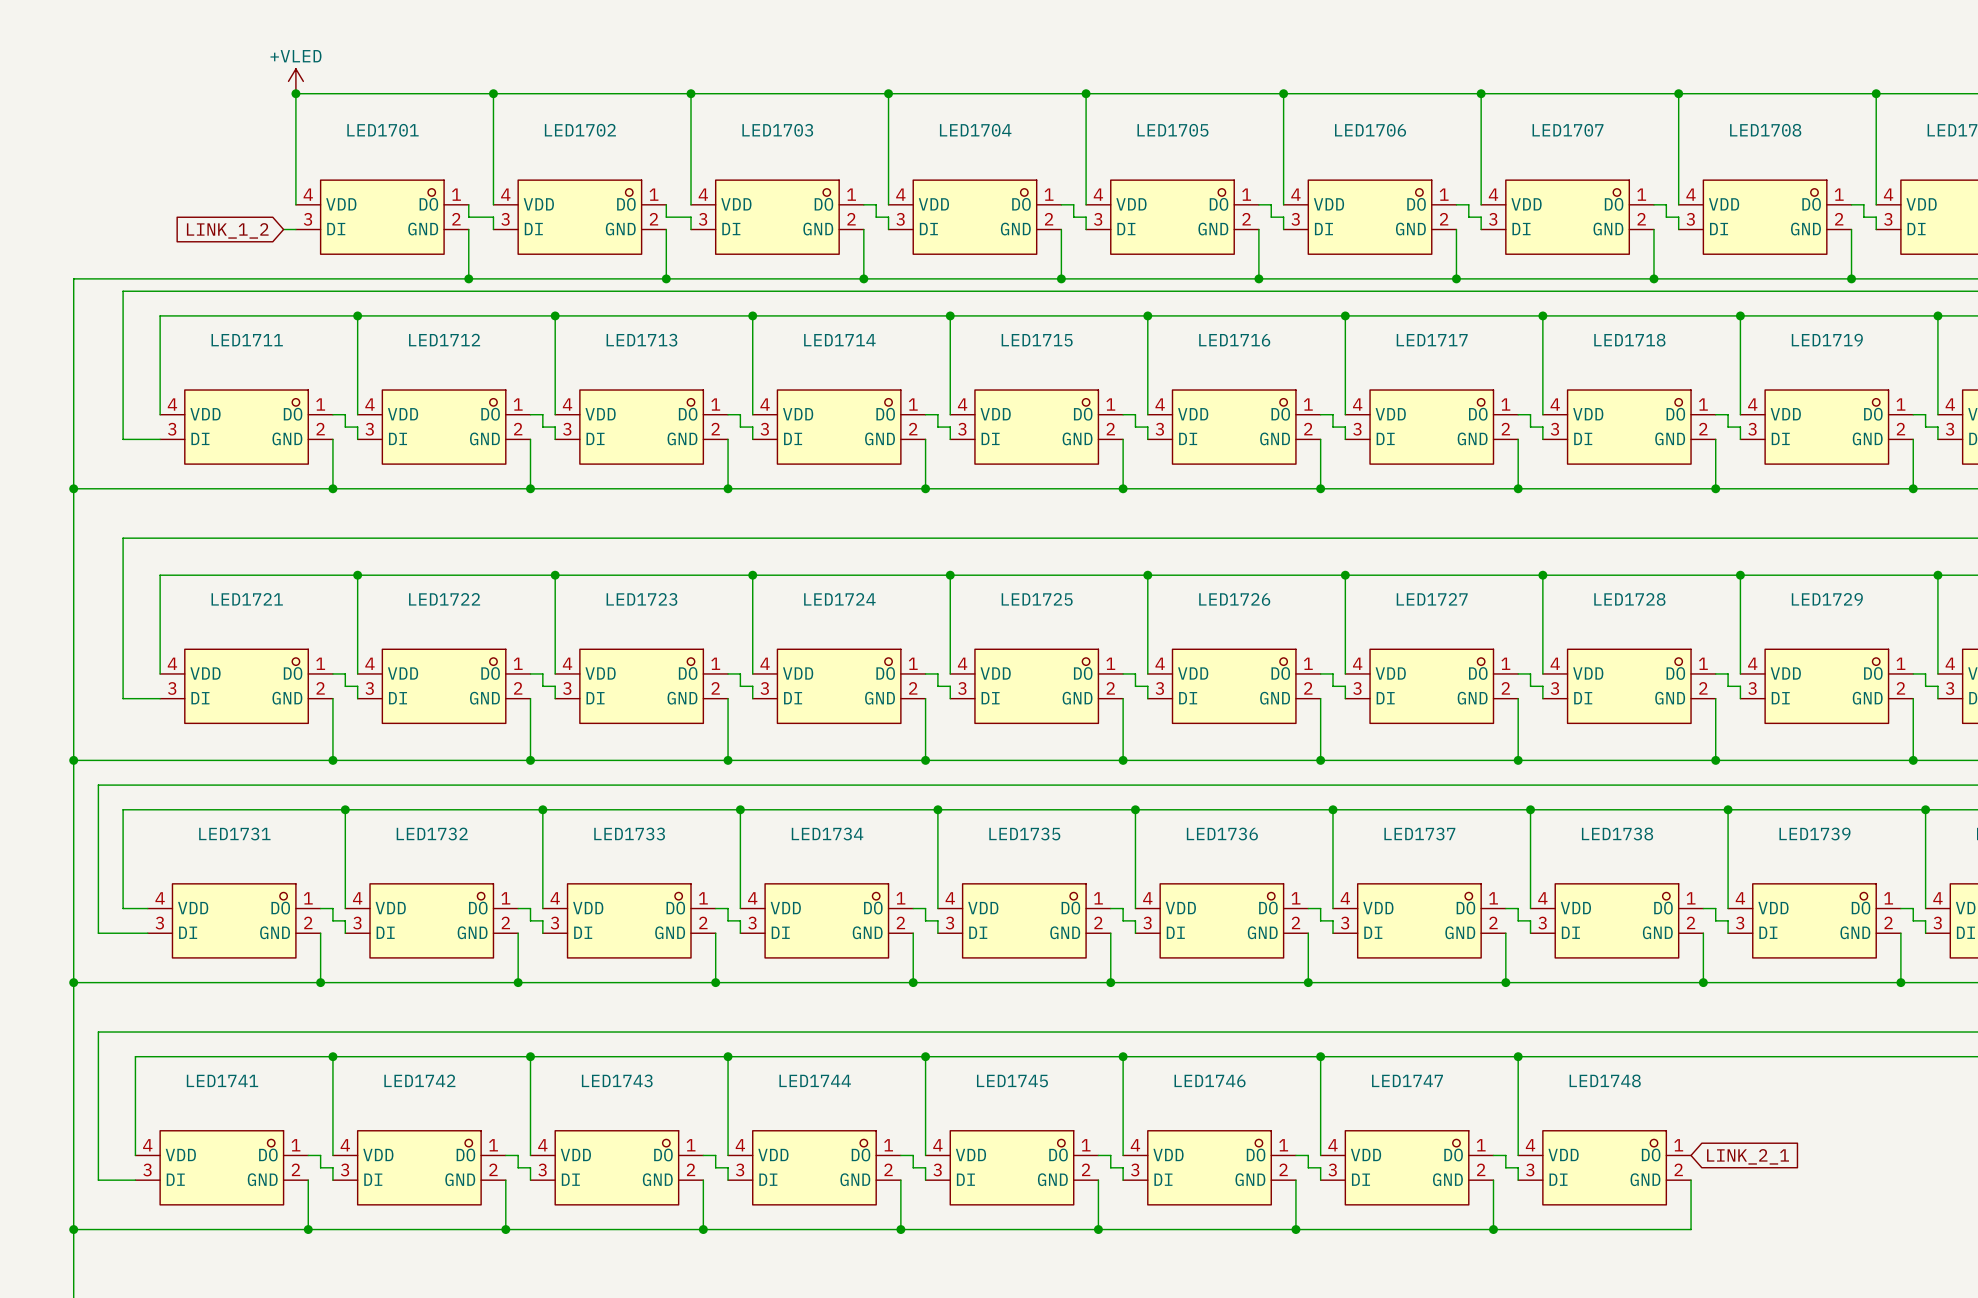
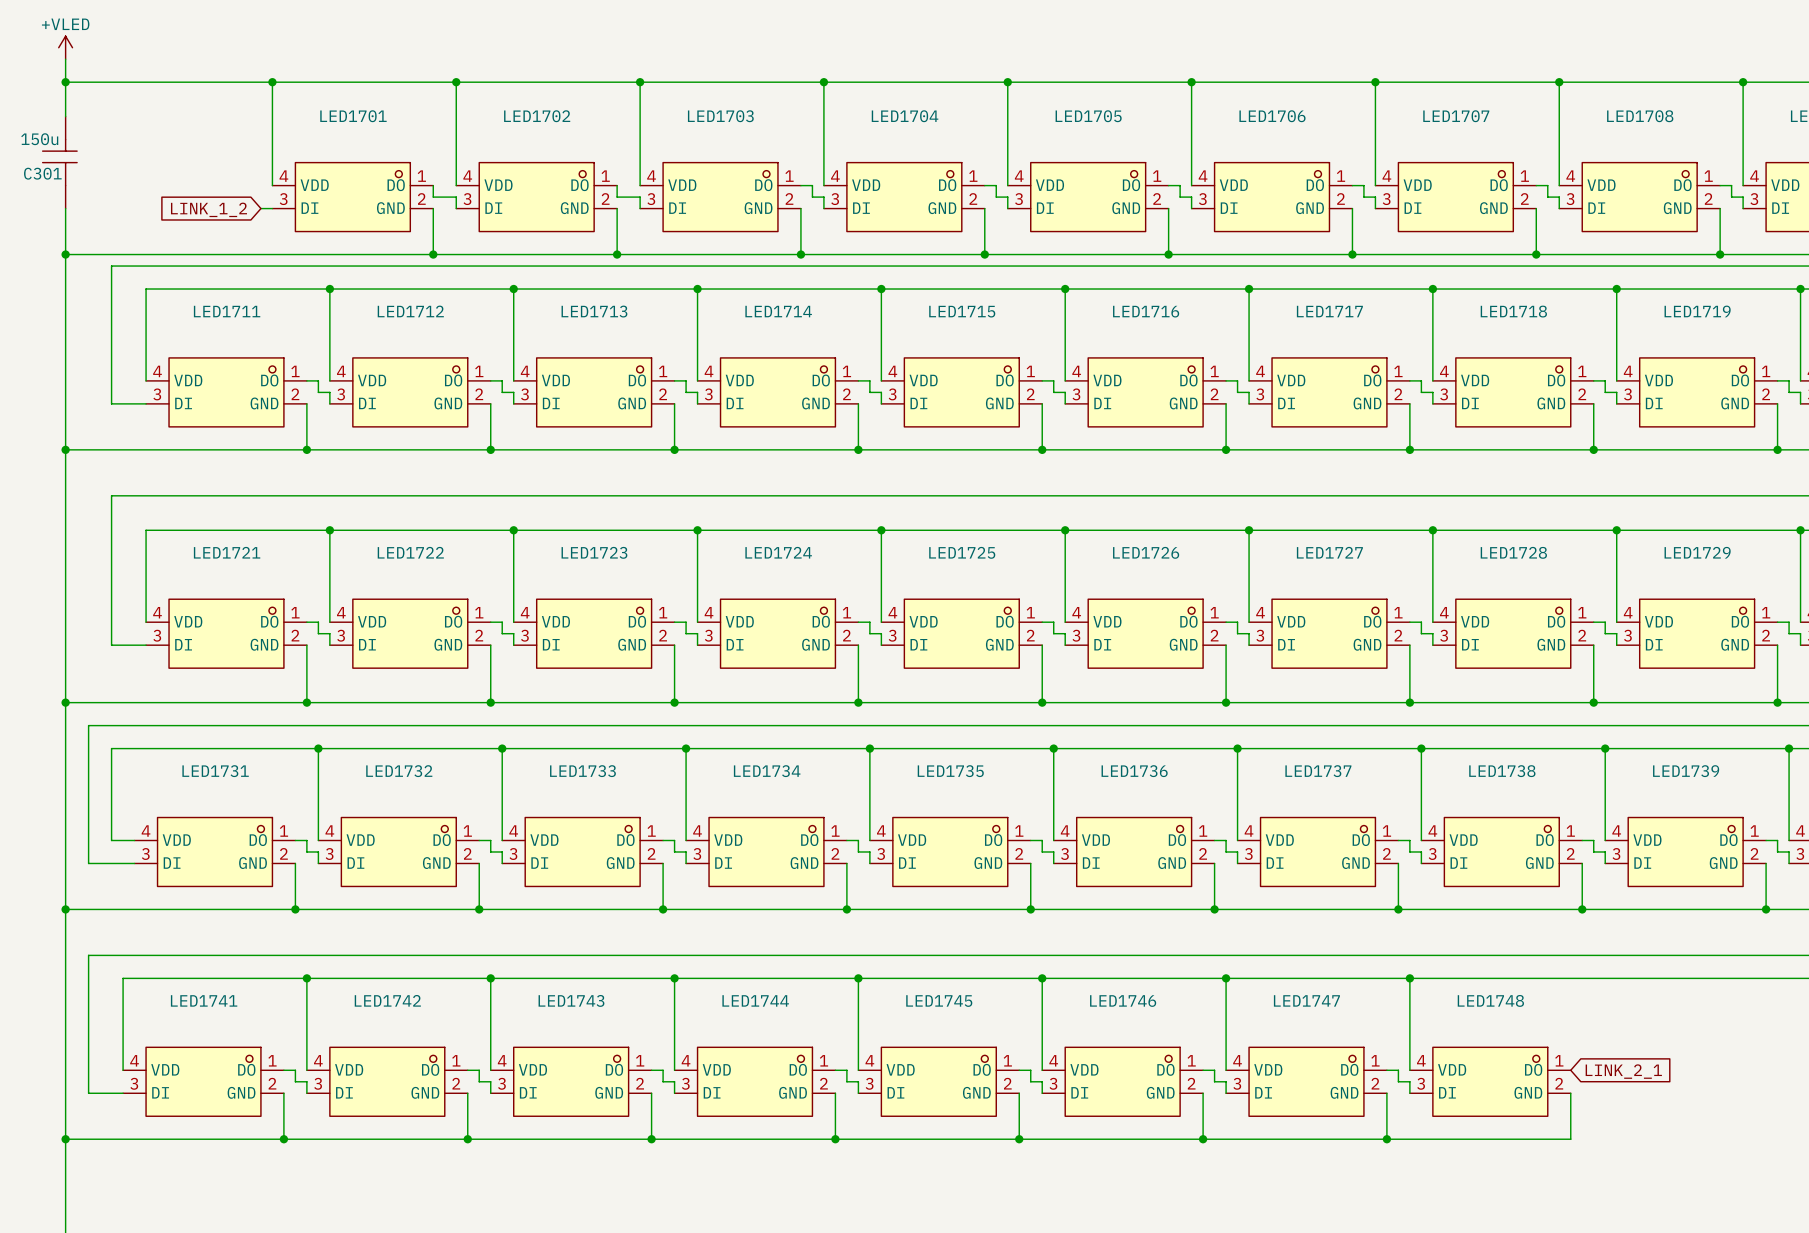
wire: none -> (65, 59) (65, 116)
power symbol position: +VLED (295, 81) -> +VLED (65, 47)
wire: none -> (65, 82) (272, 82)
junction: none -> (65, 82)
C301: none -> 150u (59, 162)
wire: none -> (65, 208) (65, 254)
junction: none -> (65, 254)

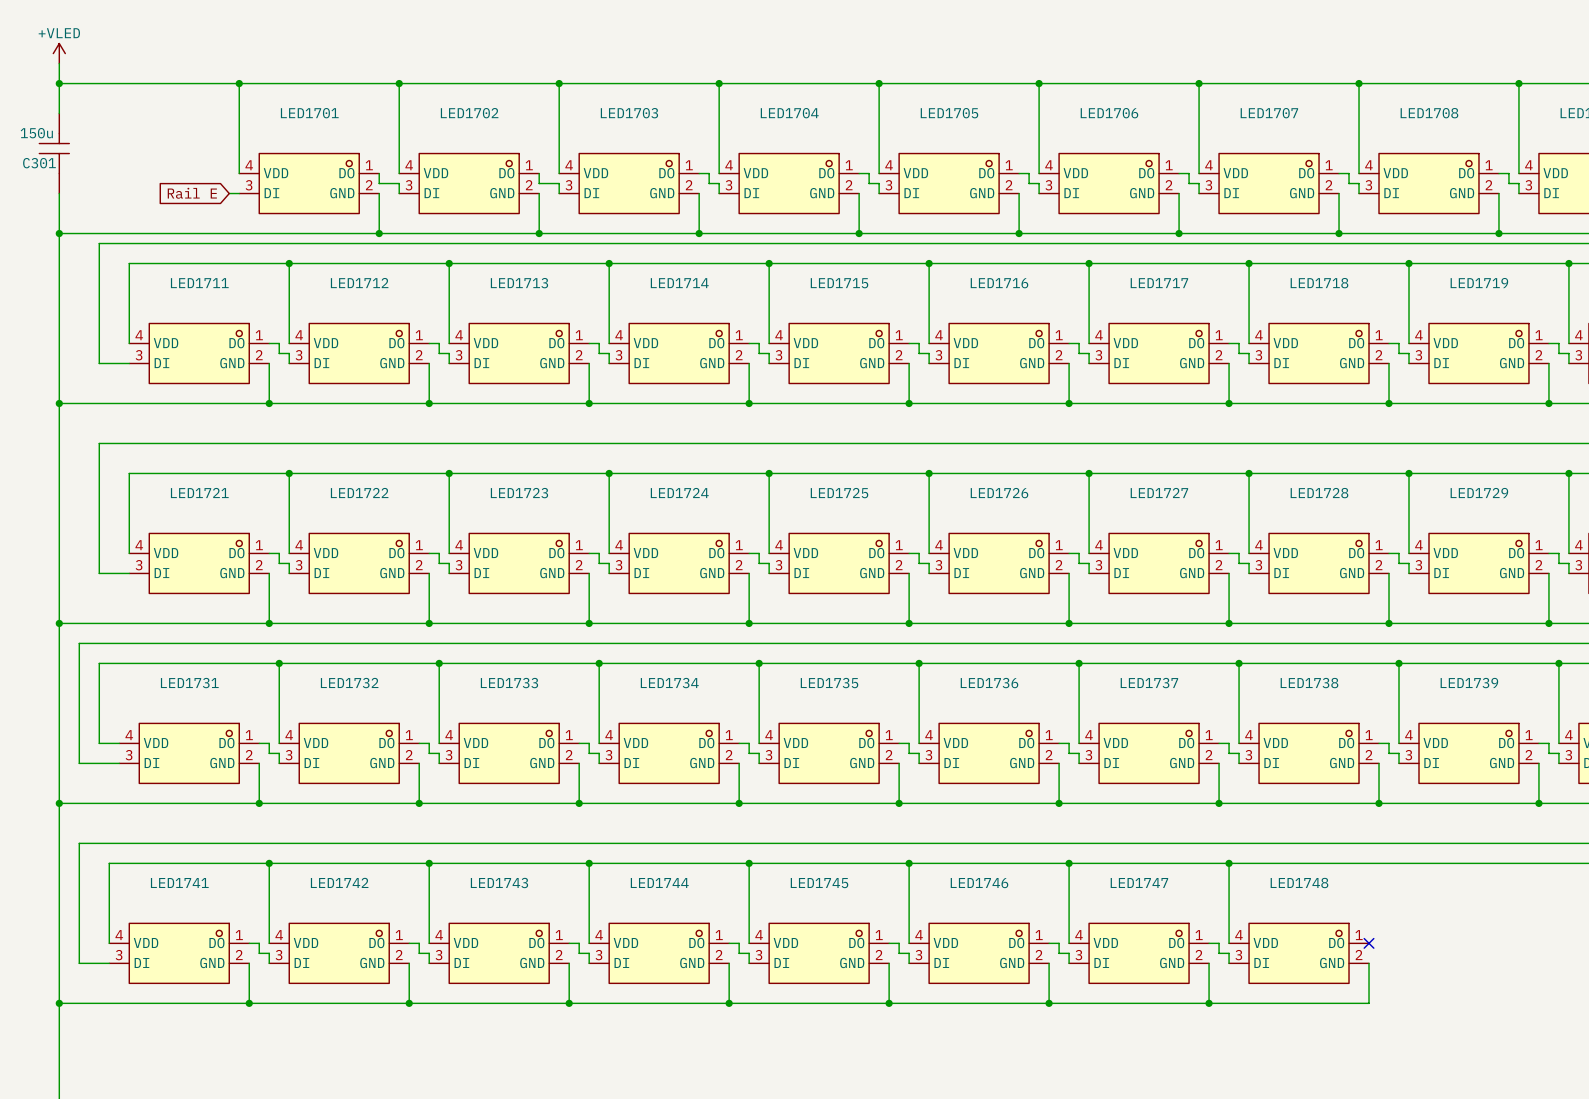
global label: LINK_1_2 (208, 209) -> Rail E (192, 193)
no-connect mark: none -> (1369, 943)
global label: LINK_2_1 (1623, 1071) -> none

